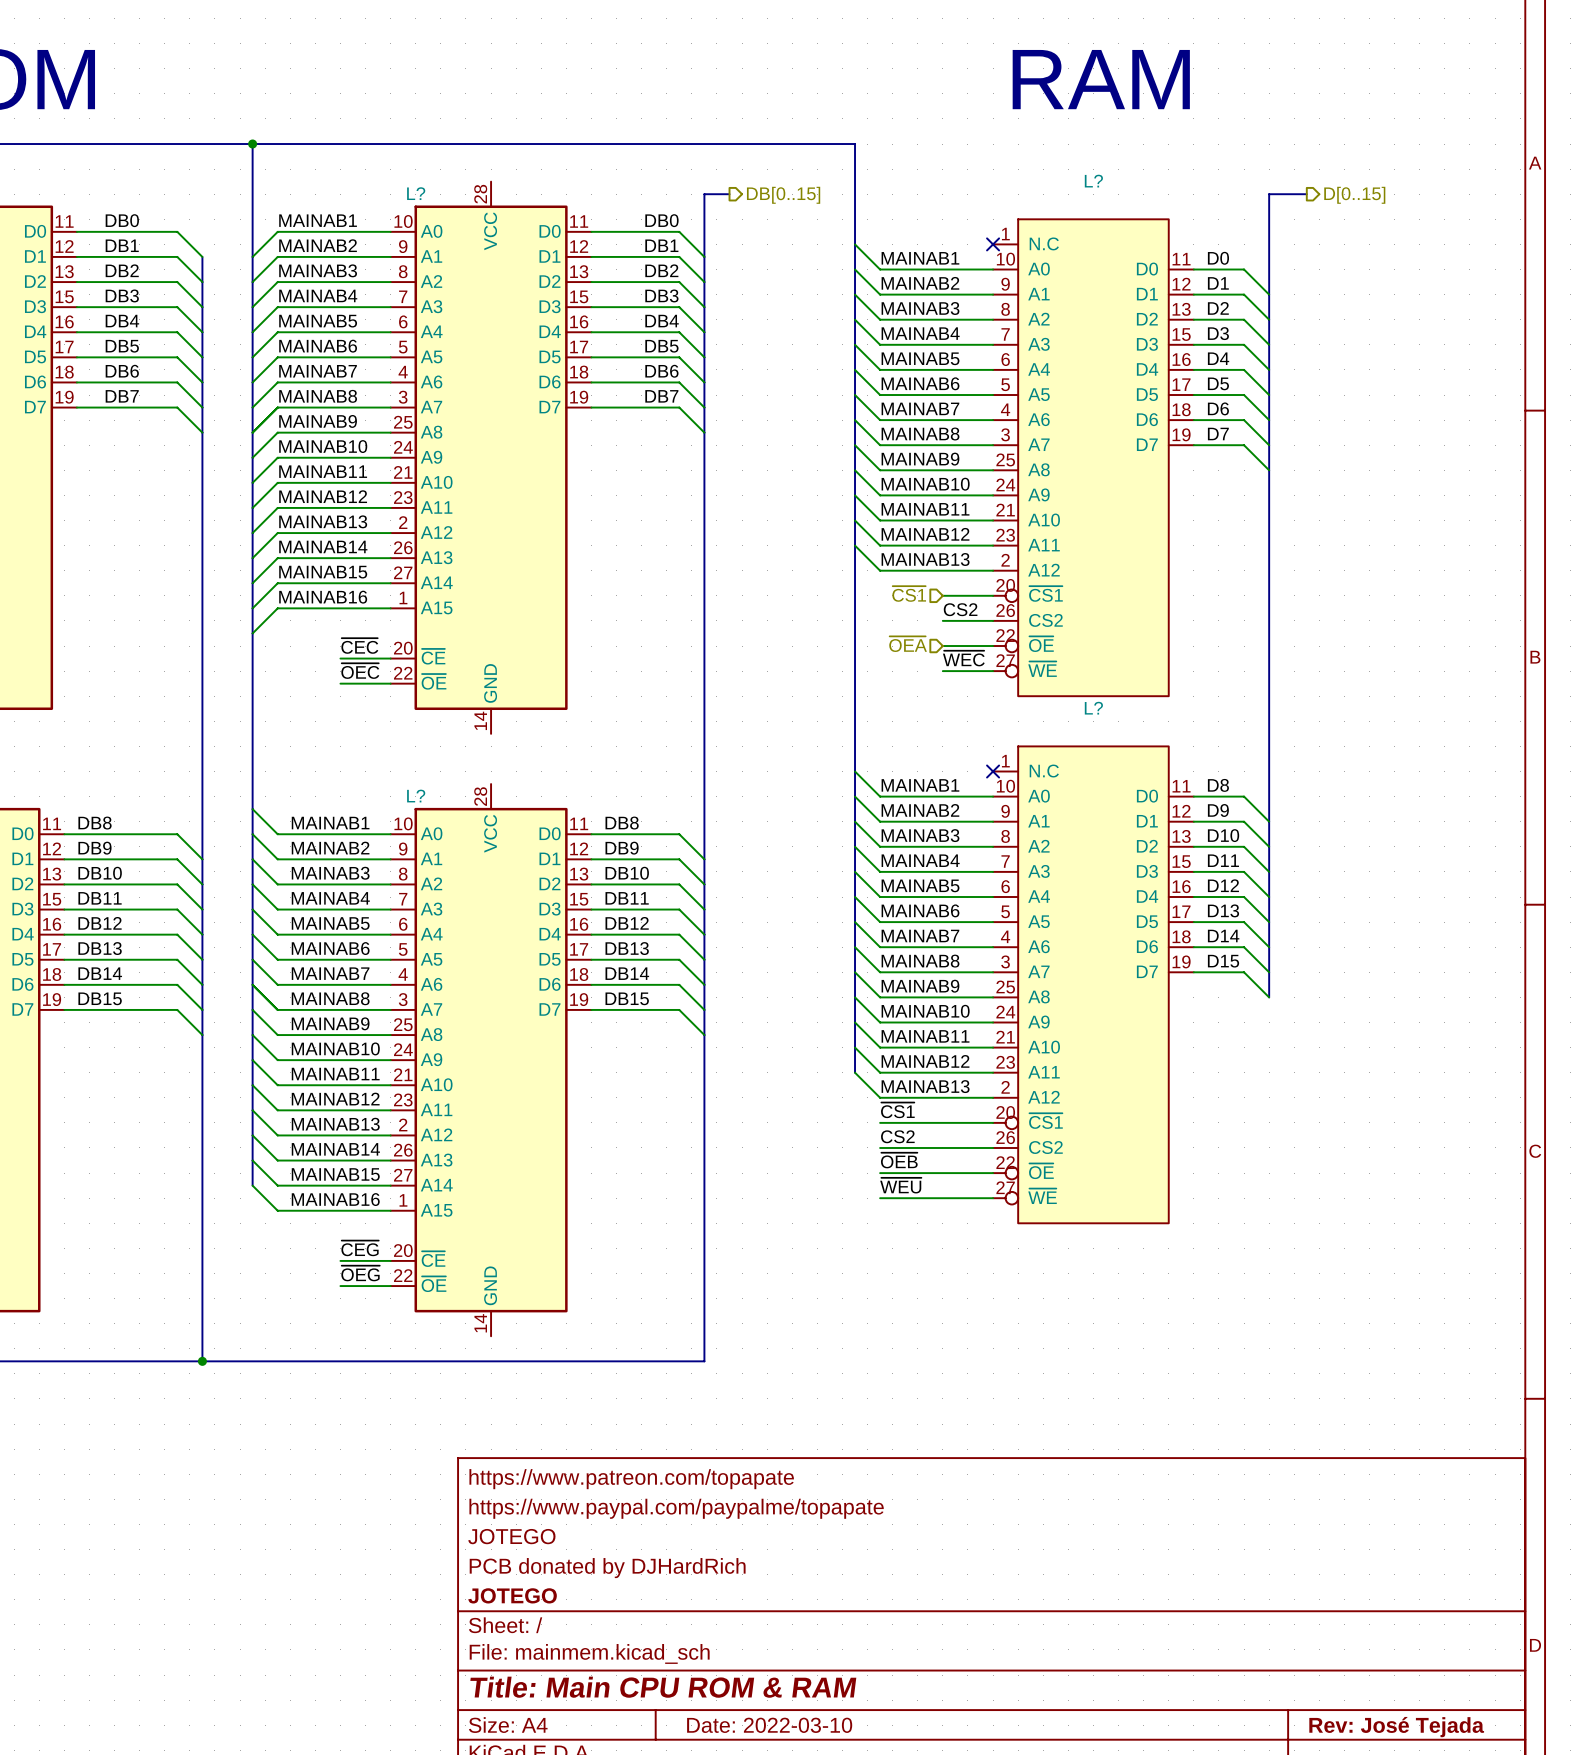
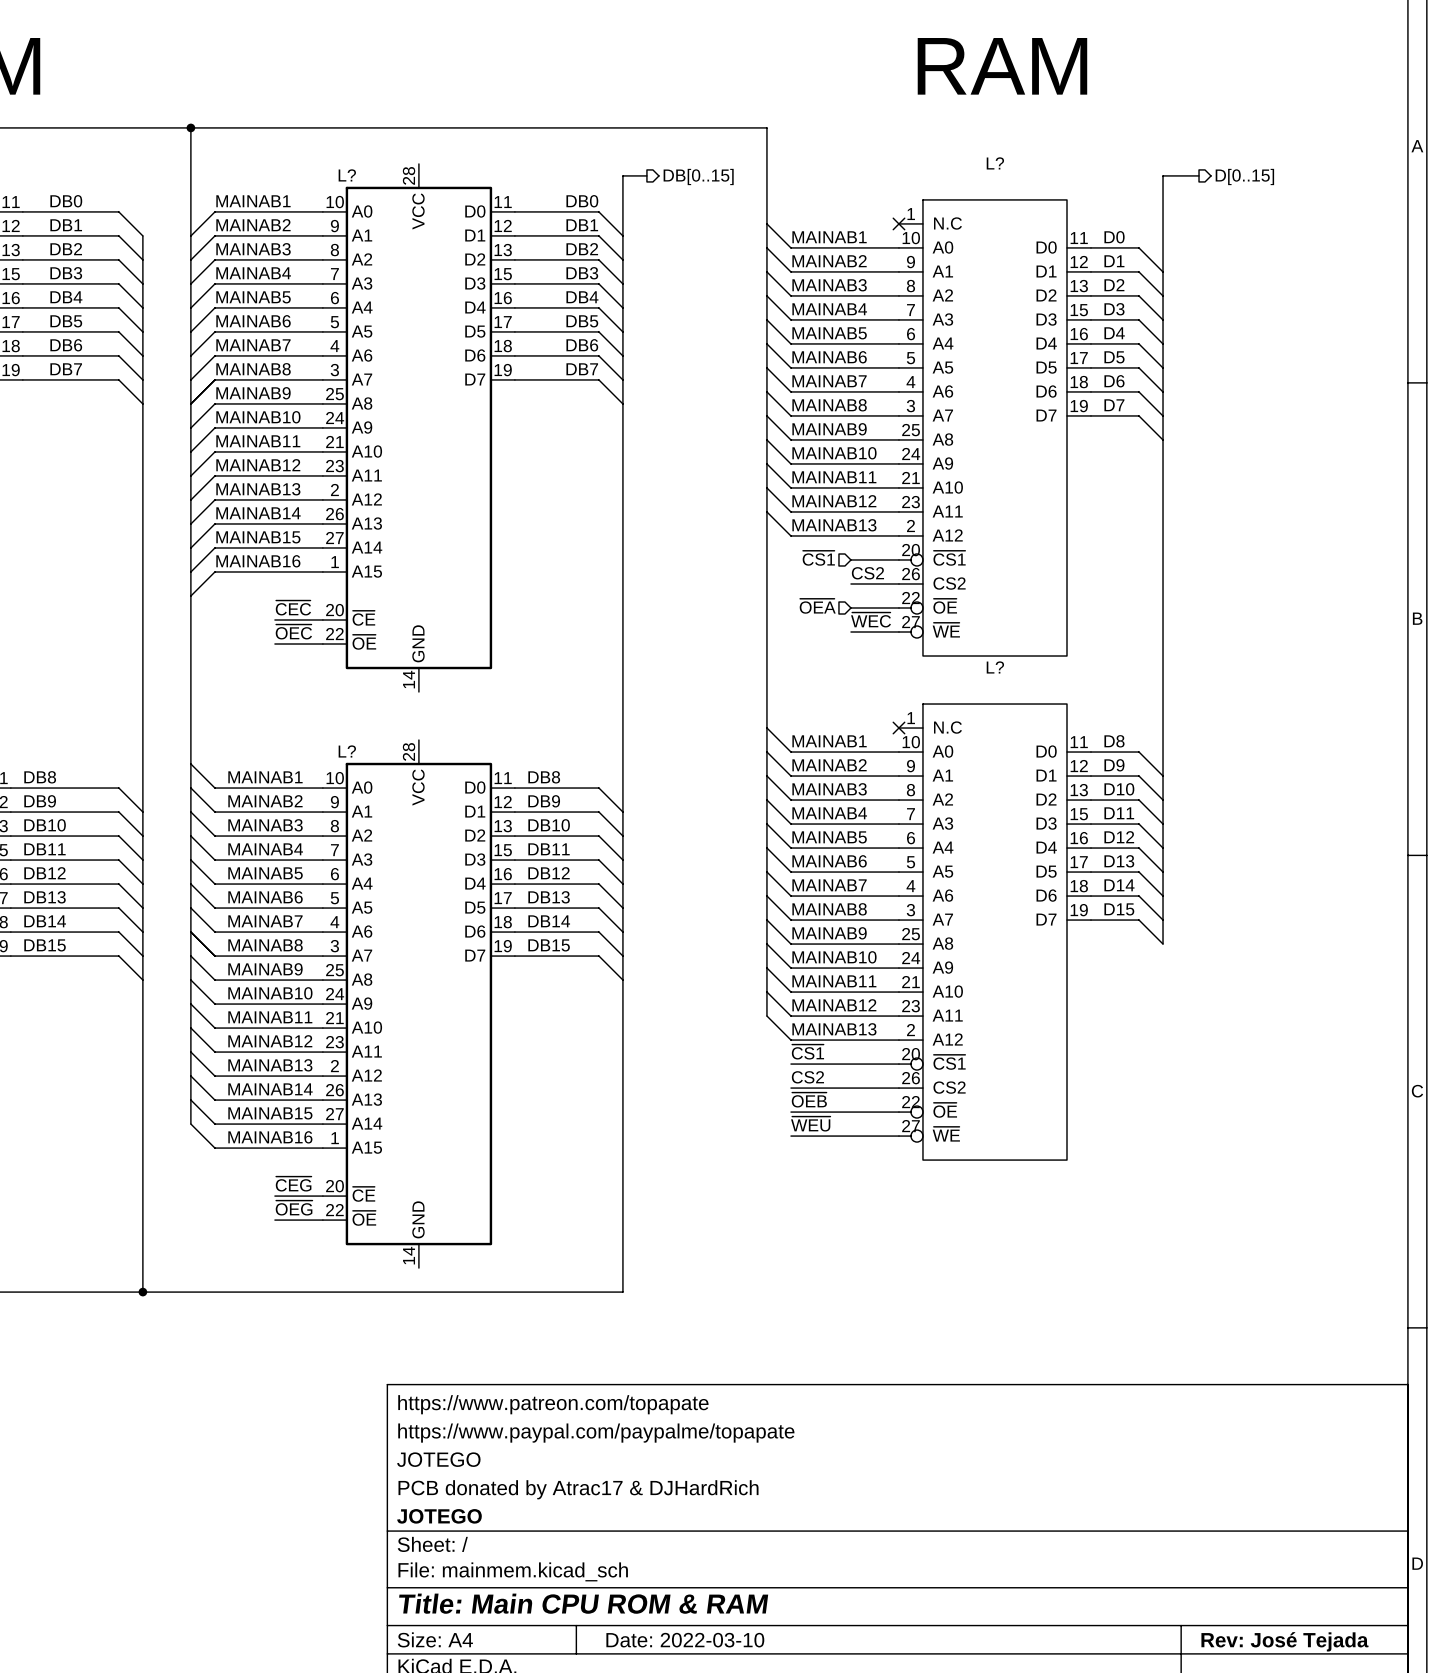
title block: PCB donated by DJHardRich (607, 1568) -> PCB donated by Atrac17 & DJHardRich (578, 1489)

